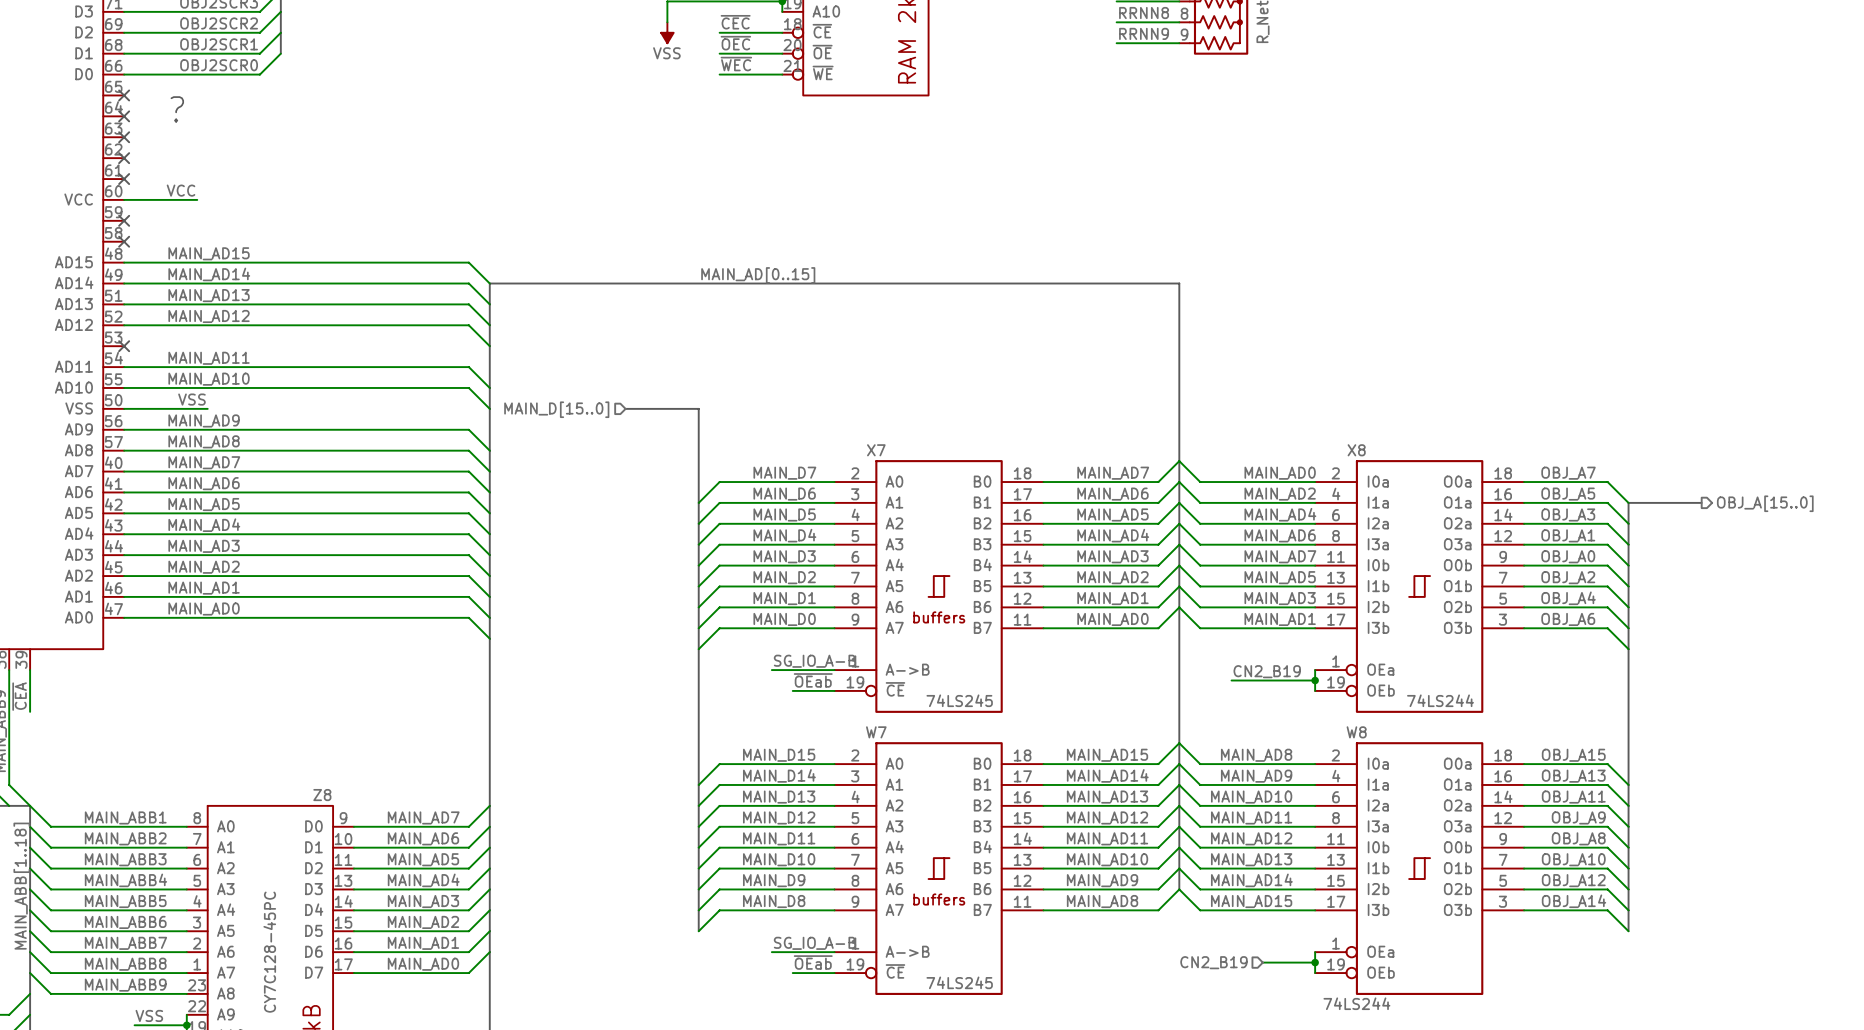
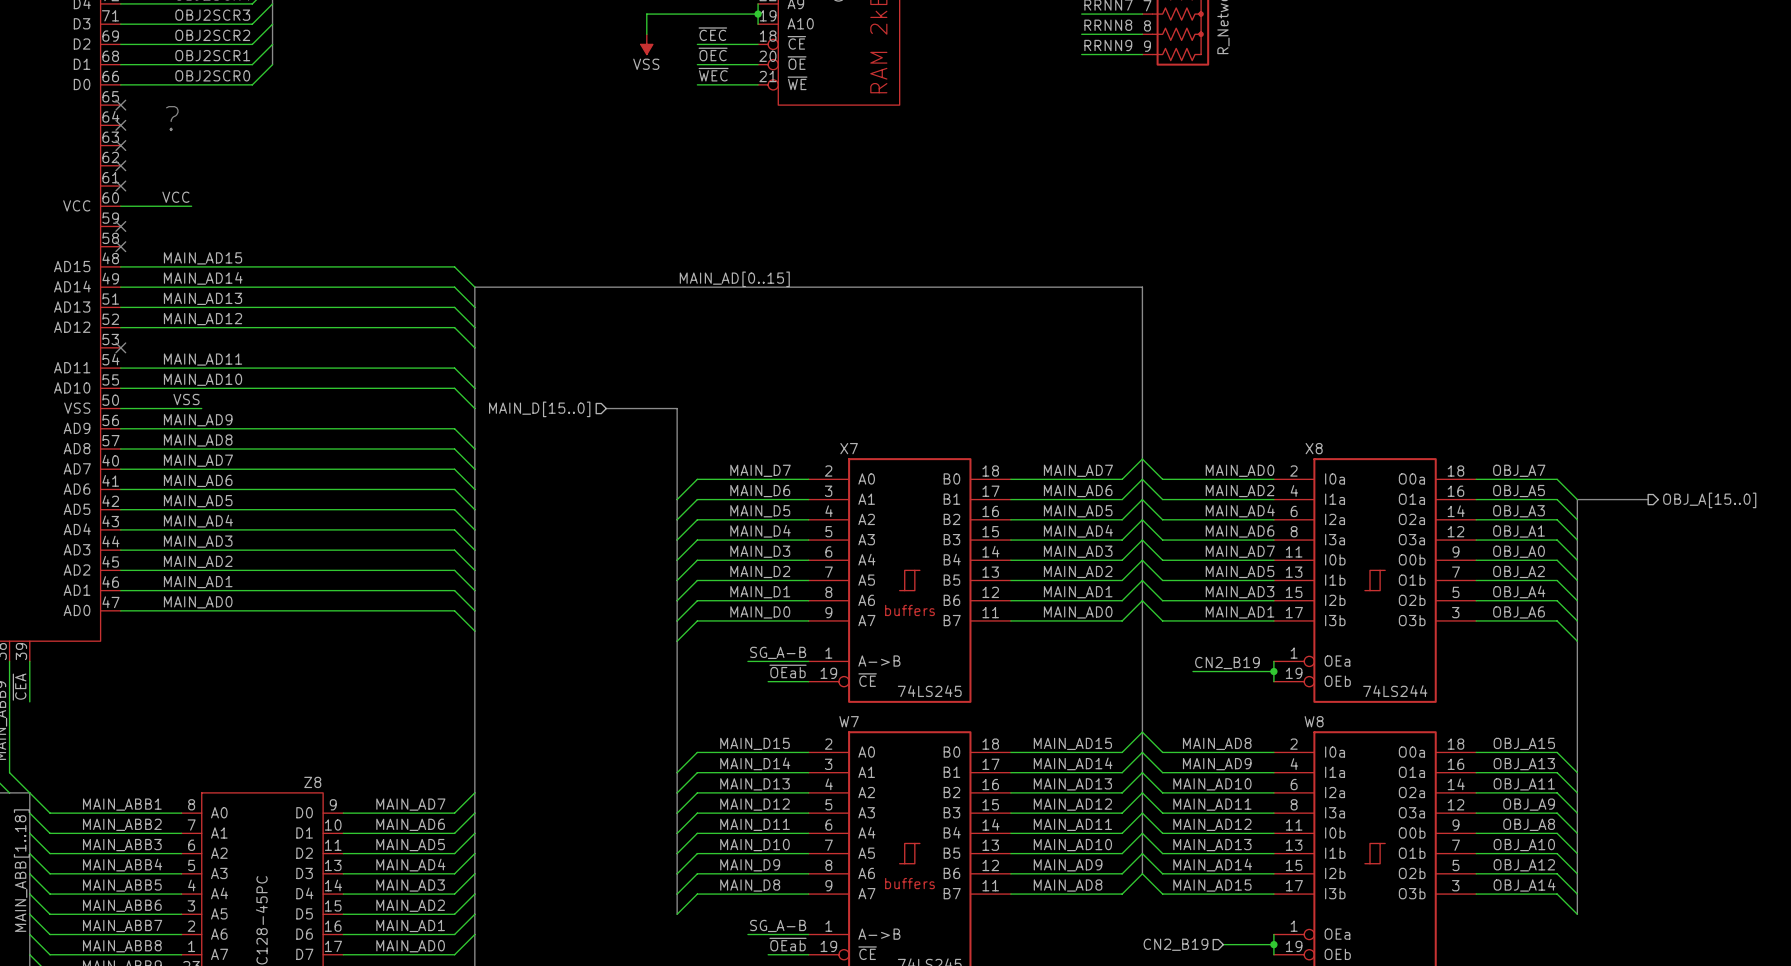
label: SG_IO_A-B (814, 661) -> SG_A-B (778, 652)
label: SG_IO_A-B (814, 943) -> SG_A-B (778, 925)

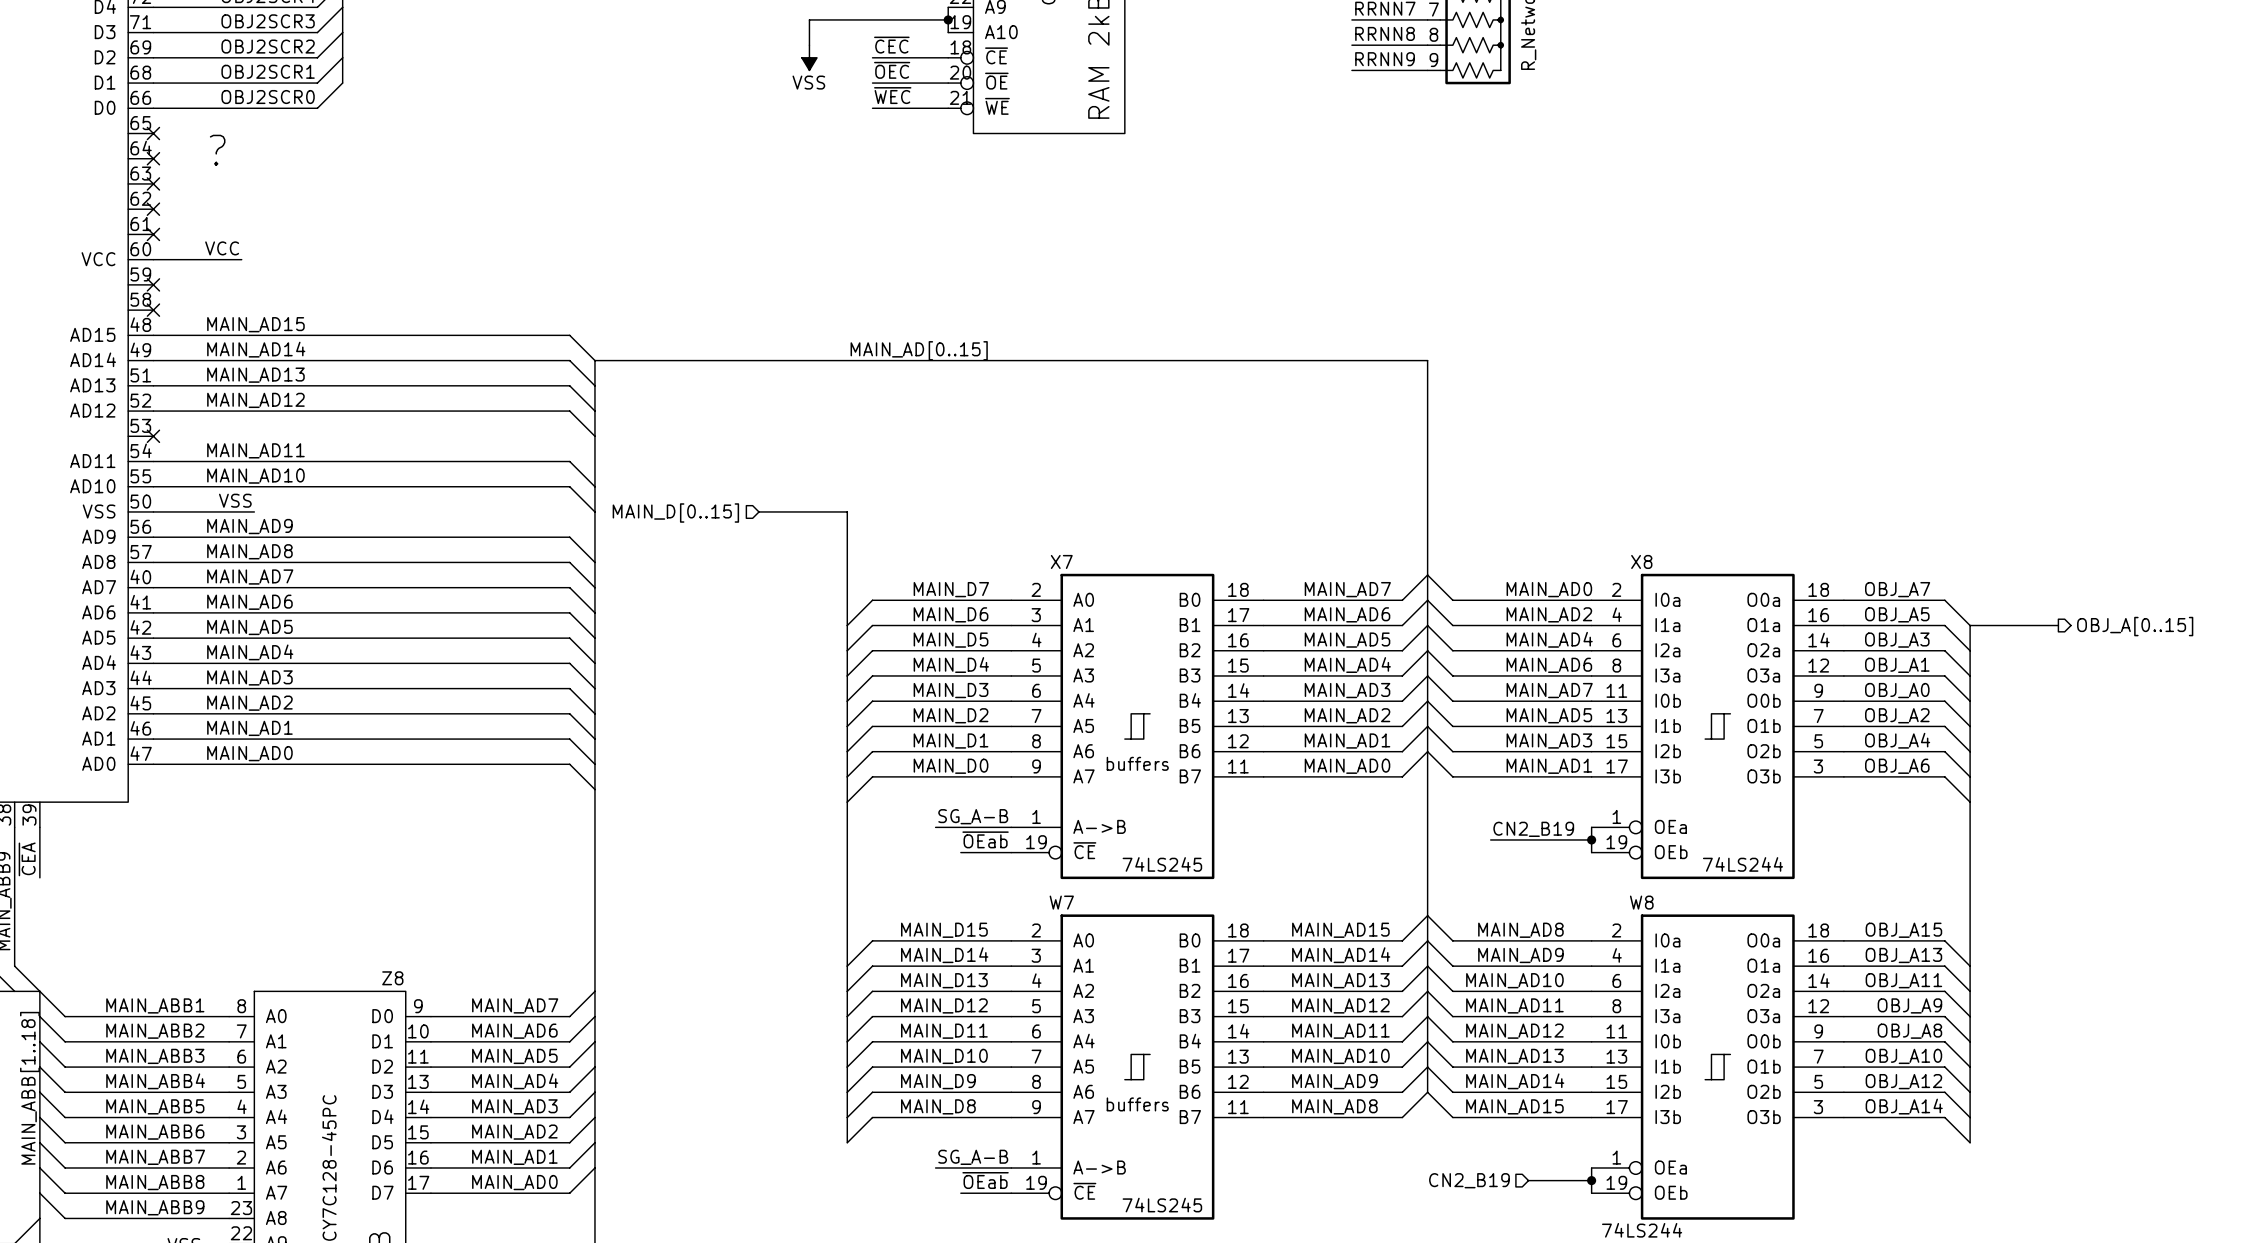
hierarchical label: MAIN_D[15..0] (539, 409) -> MAIN_D[0..15] (675, 513)
hierarchical label: OBJ_A[15..0] (1709, 500) -> OBJ_A[0..15] (2135, 626)

